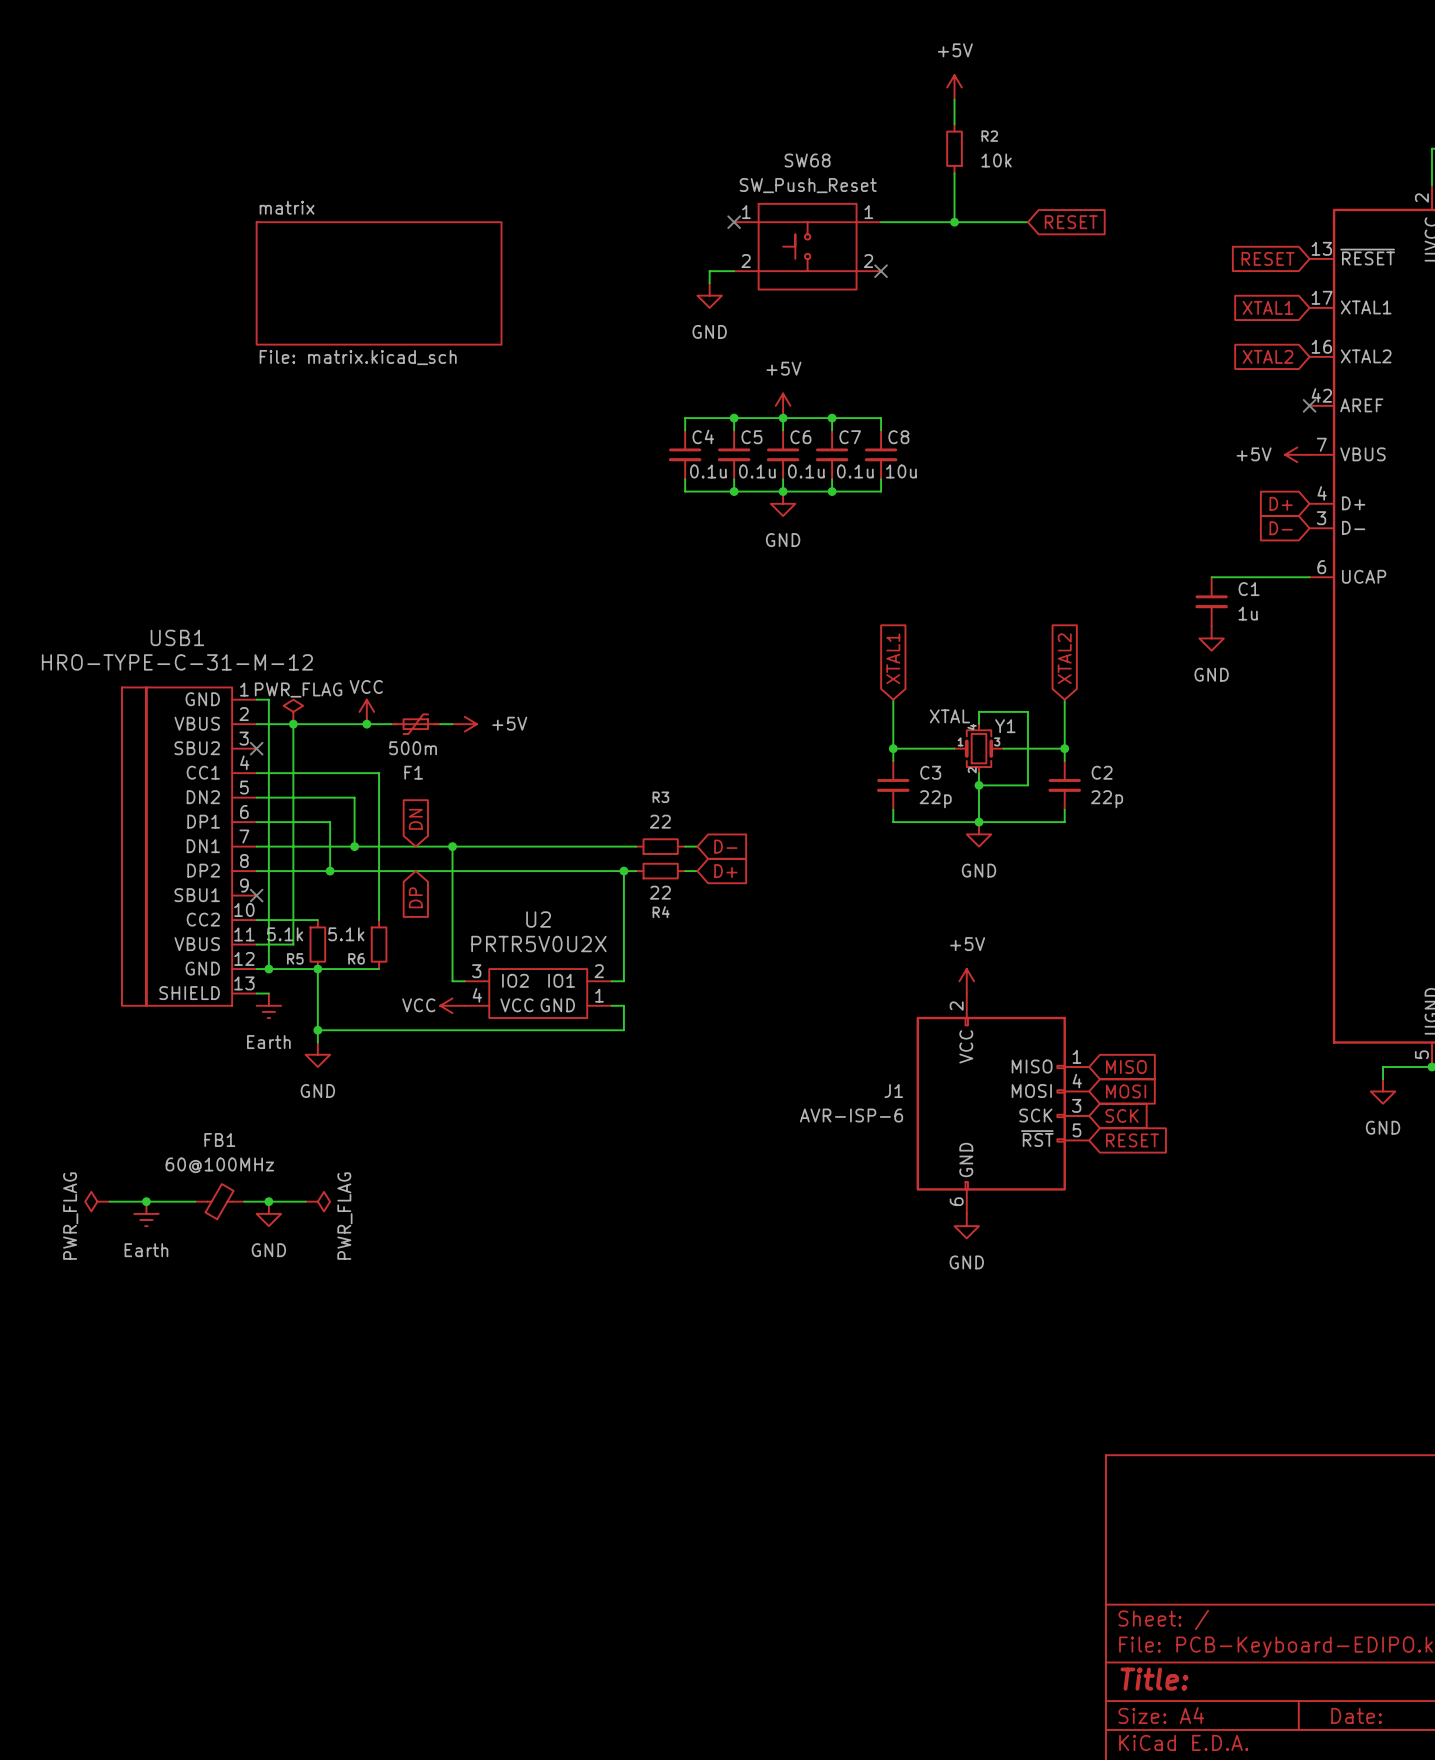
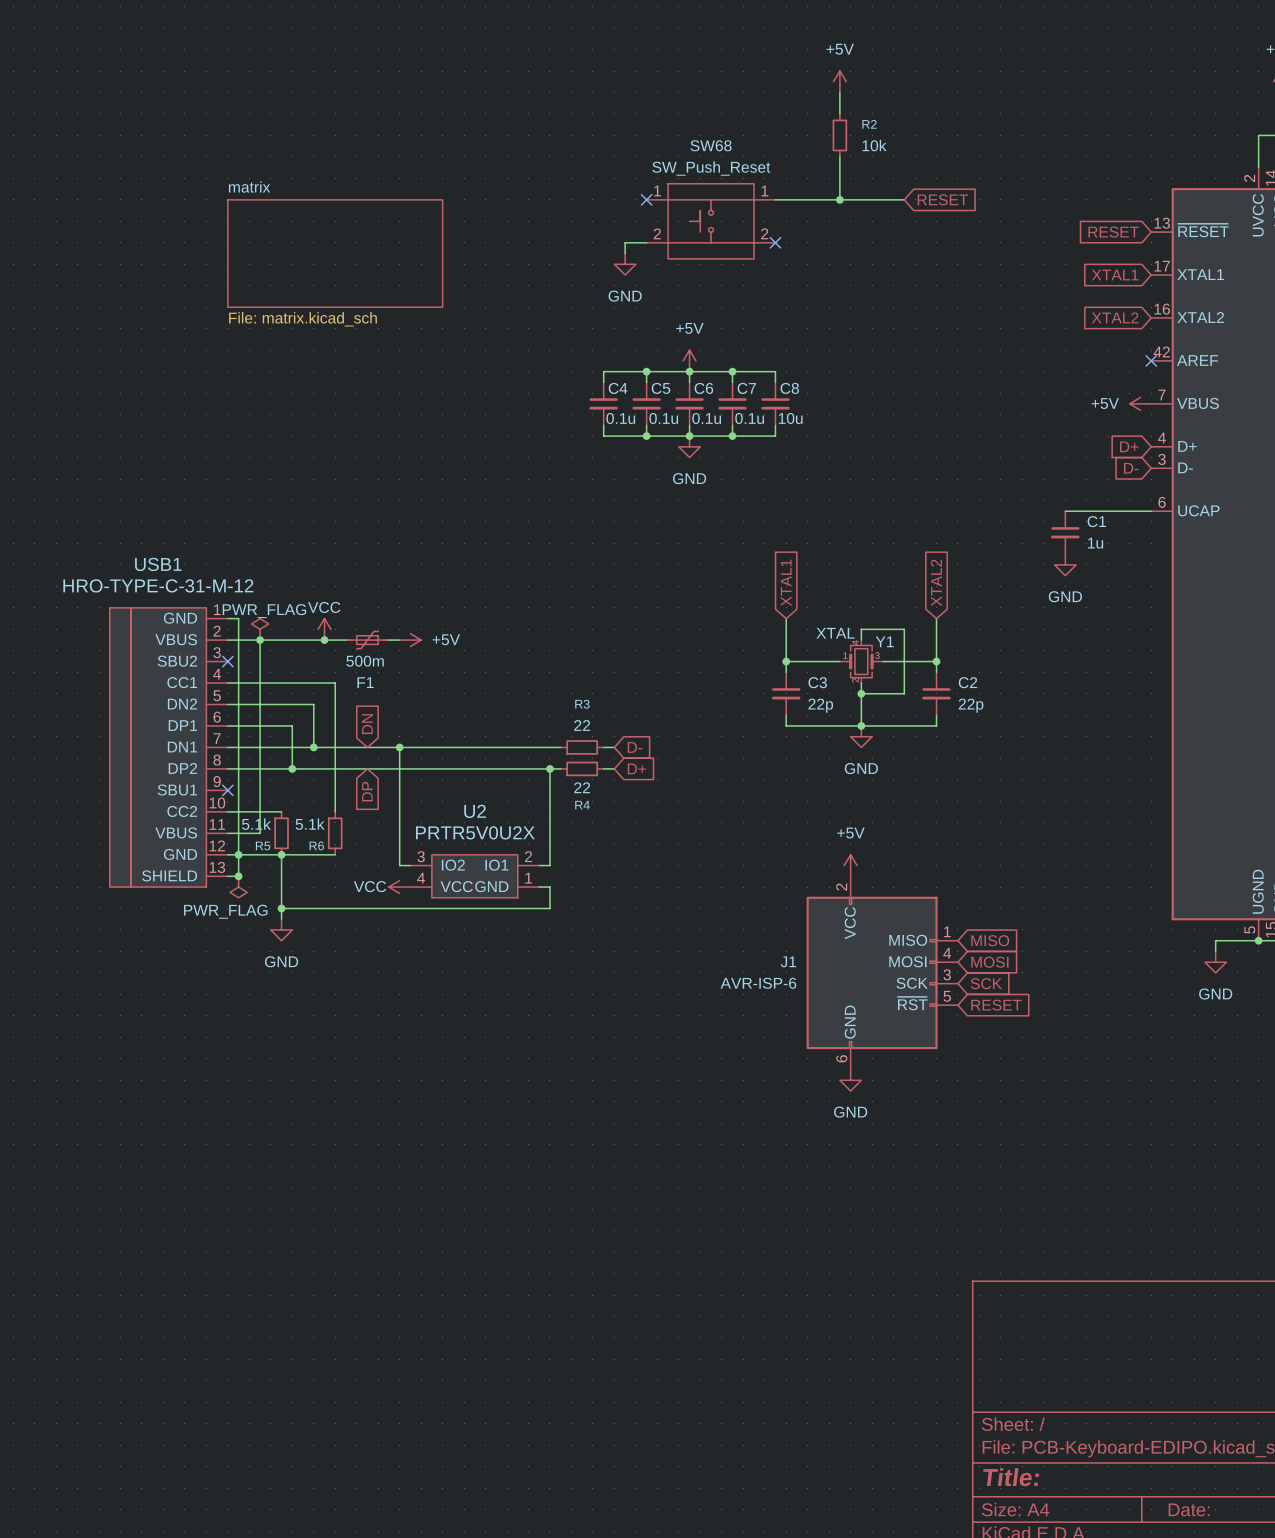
wire: none -> (238, 854) (238, 876)
junction: none -> (238, 876)
power symbol: Earth (268, 1005) -> PWR_FLAG (238, 887)
power symbol: PWR_FLAG (97, 1201) -> none
wire: (109, 1201) (195, 1201) -> none
junction: (146, 1201) -> none
FB1: 60@100MHz (219, 1201) -> none
wire: (244, 1201) (305, 1201) -> none
junction: (268, 1201) -> none
power symbol: PWR_FLAG (317, 1201) -> none
power symbol: Earth (146, 1213) -> none
power symbol: GND (268, 1213) -> none

